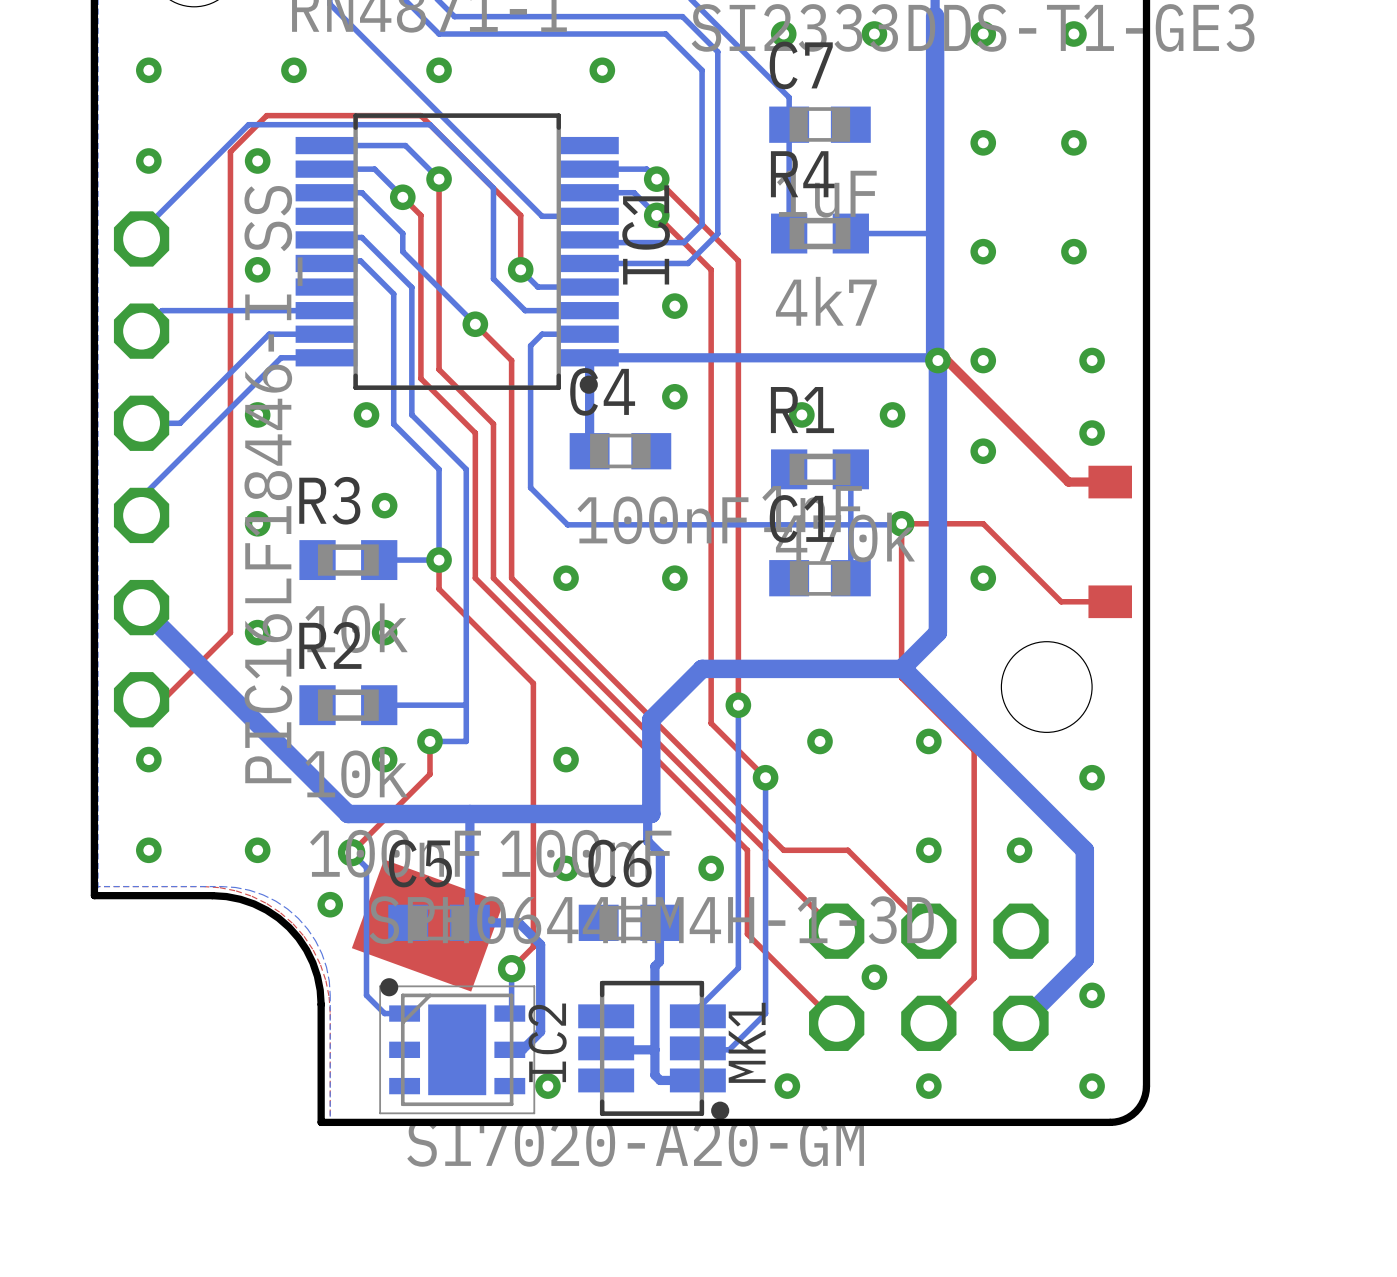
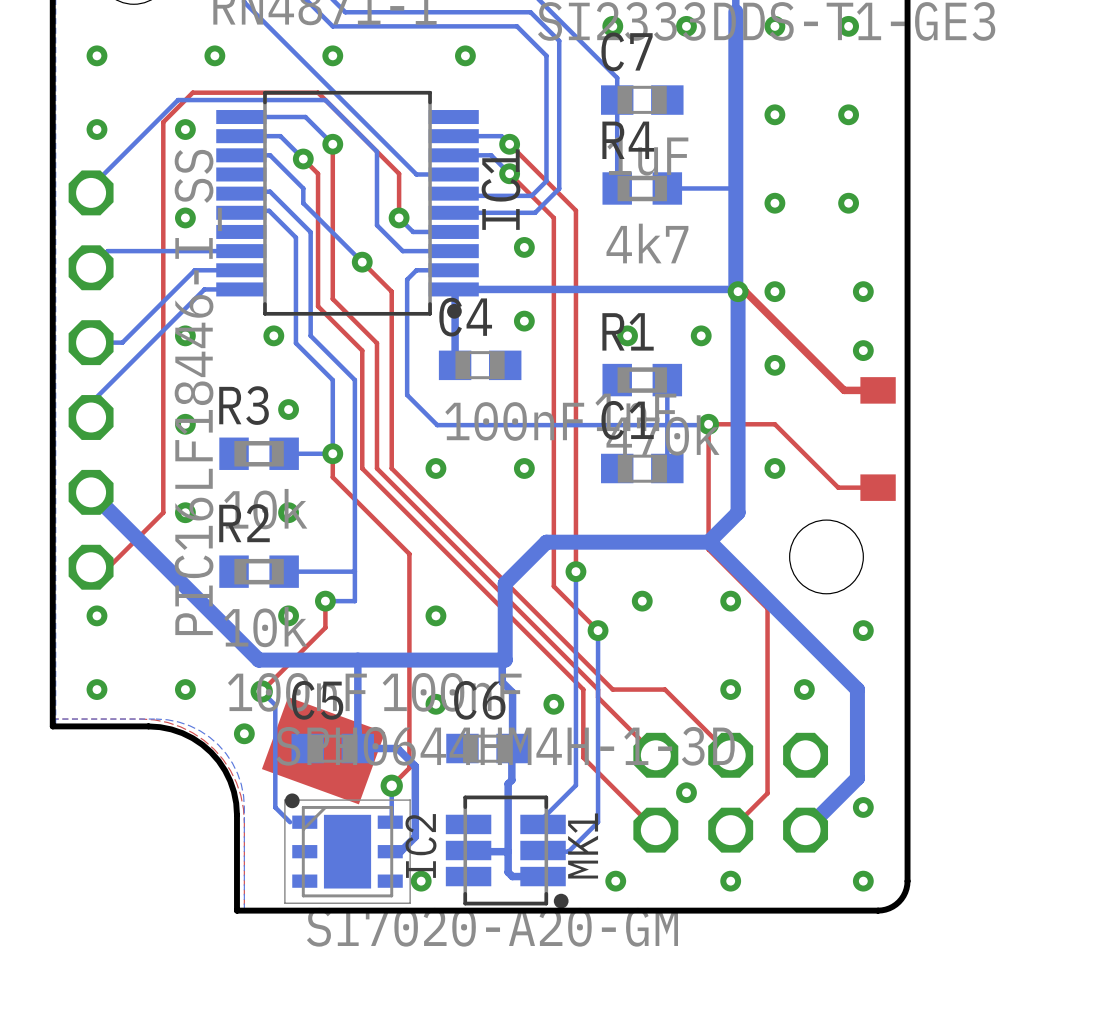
bottom track: (366, 867) (366, 995) (384, 1013) (404, 1013) -> (273, 703) (275, 807) (290, 822)

